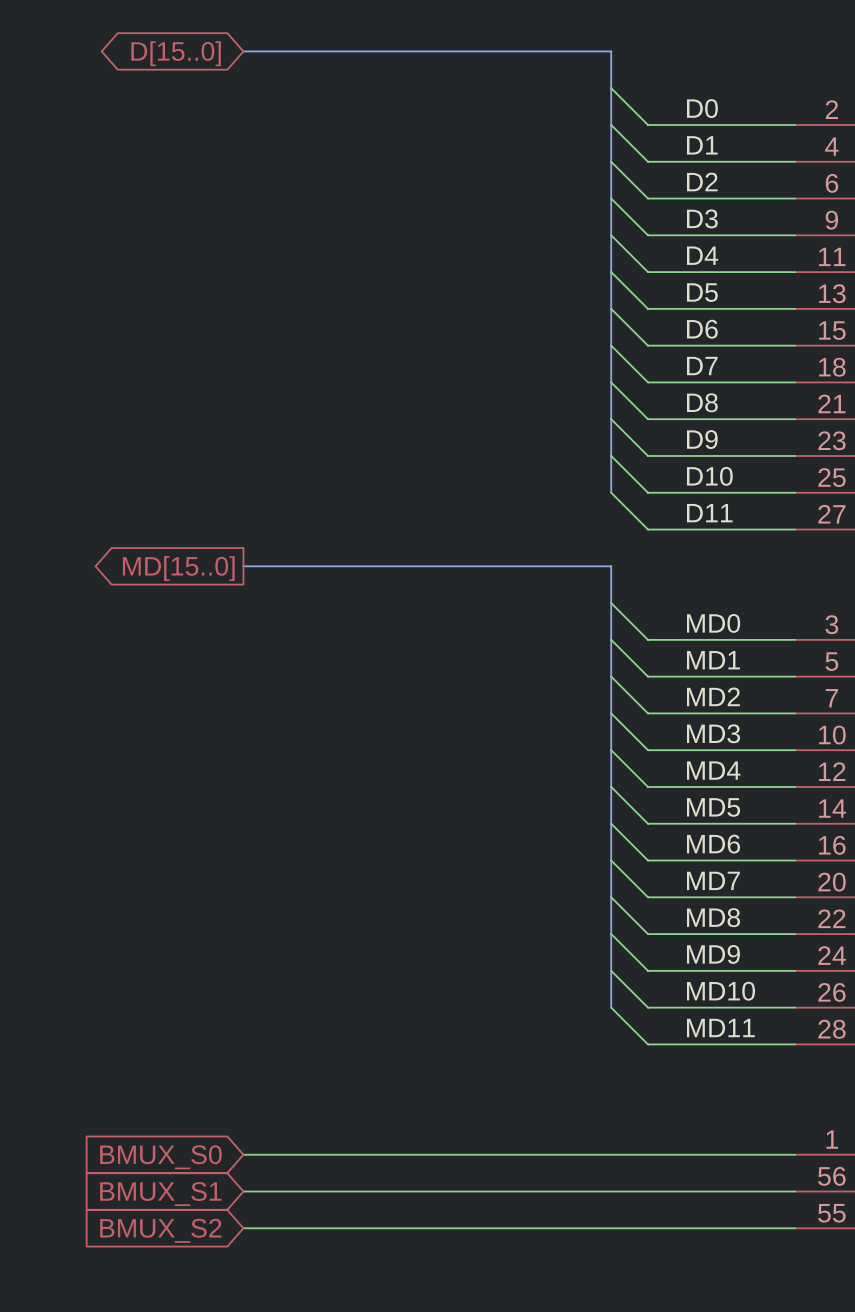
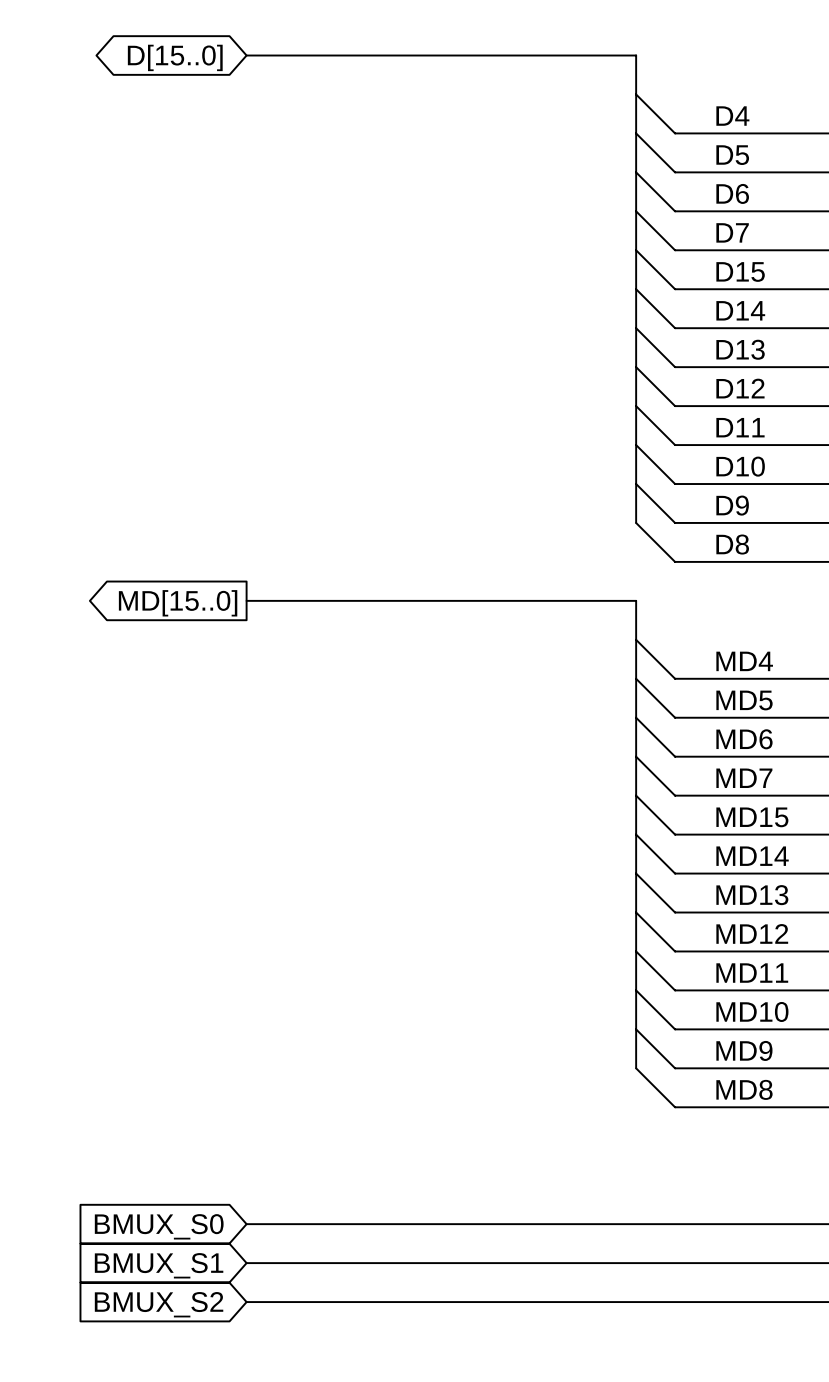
label: D0 (702, 108) -> D4 (732, 116)
label: D1 (702, 145) -> D5 (732, 155)
label: D2 (702, 182) -> D6 (732, 193)
label: D3 (702, 218) -> D7 (732, 232)
label: D4 (702, 255) -> D15 (740, 271)
label: D5 (702, 292) -> D14 (740, 310)
label: D6 (702, 329) -> D13 (740, 349)
label: D7 (702, 366) -> D12 (740, 388)
label: D8 (702, 402) -> D11 (740, 427)
label: D9 (702, 439) -> D10 (740, 466)
label: D10 (709, 476) -> D9 (732, 505)
label: D11 (709, 513) -> D8 (732, 544)
label: MD0 (713, 623) -> MD4 (744, 661)
label: MD1 (713, 660) -> MD5 (744, 700)
label: MD2 (713, 696) -> MD6 (744, 739)
label: MD3 (713, 733) -> MD7 (744, 778)
label: MD4 (713, 770) -> MD15 (752, 817)
label: MD5 (713, 807) -> MD14 (752, 856)
label: MD6 (713, 844) -> MD13 (752, 895)
label: MD7 (713, 880) -> MD12 (752, 933)
label: MD8 (713, 917) -> MD11 (752, 973)
label: MD9 (713, 954) -> MD10 (752, 1011)
label: MD10 (721, 991) -> MD9 (744, 1050)
label: MD11 (720, 1028) -> MD8 (744, 1089)

